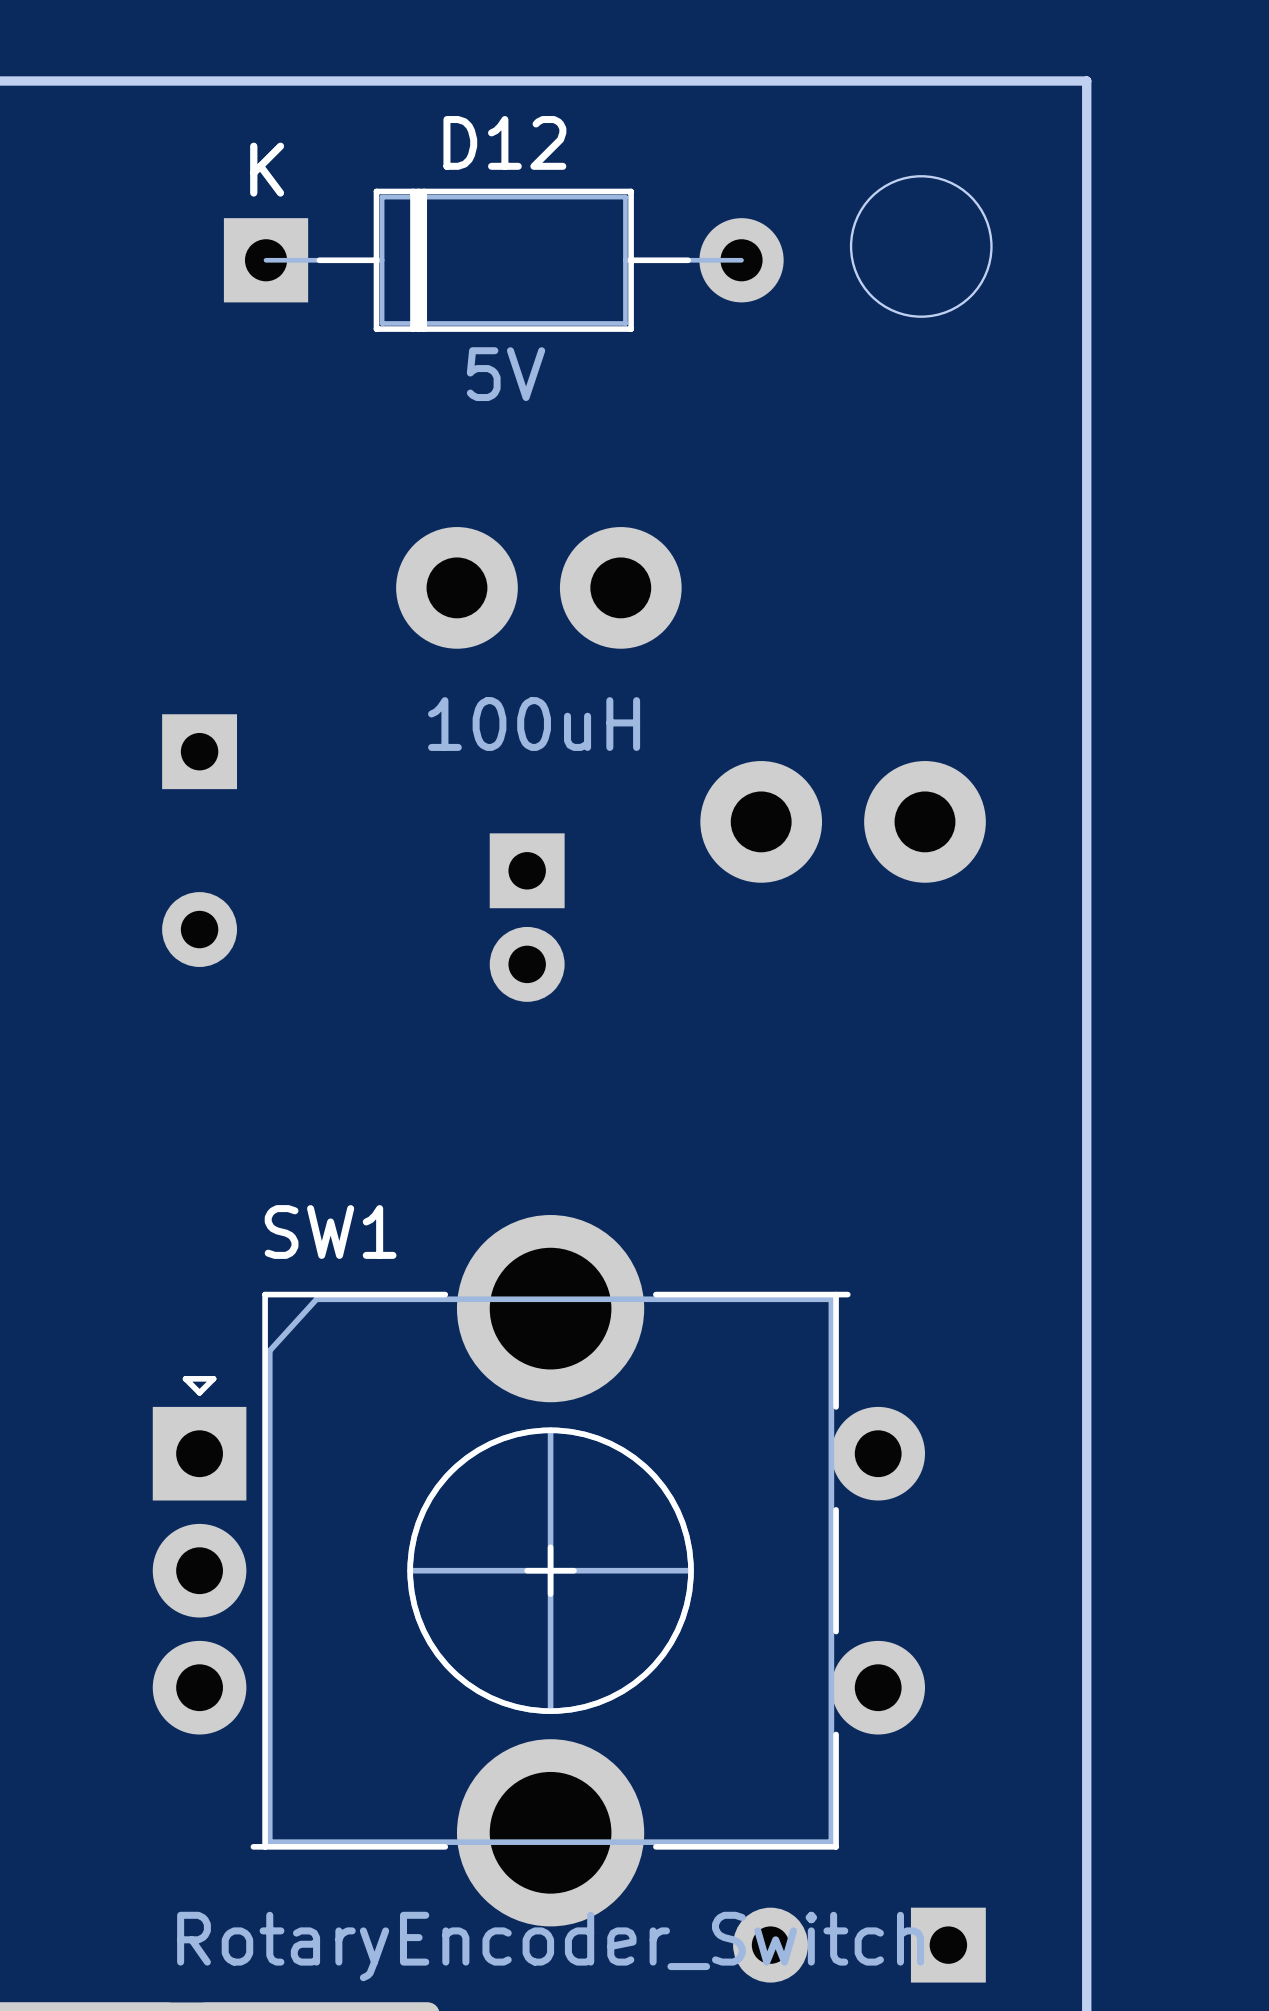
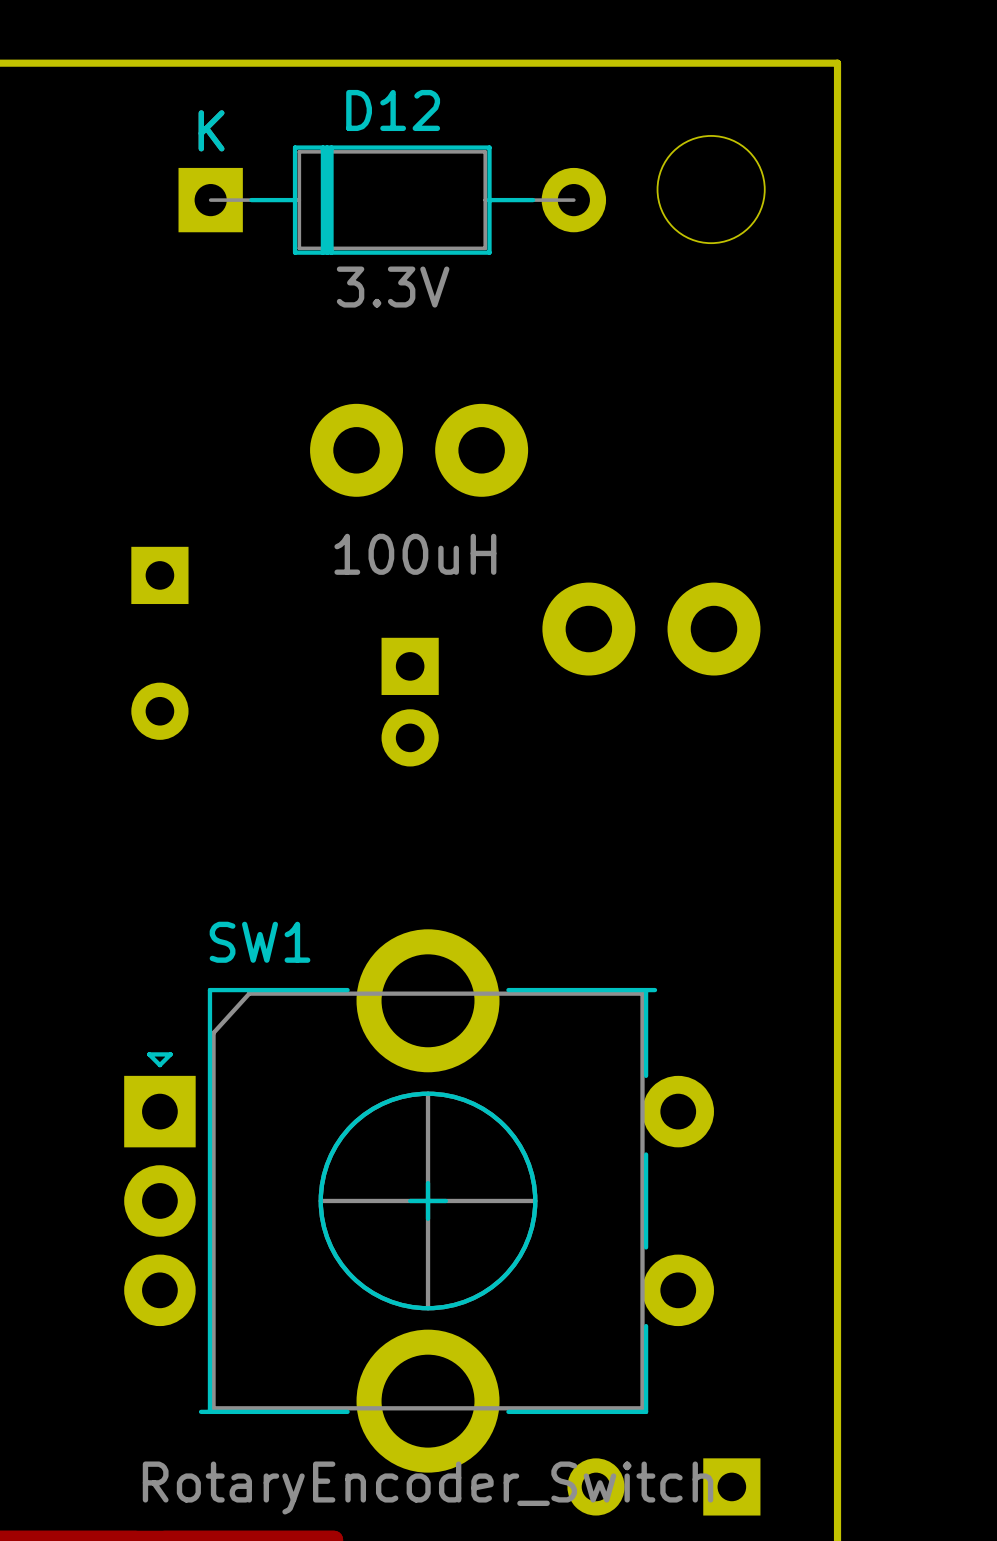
D12 value: 5V (506, 374) -> 3.3V (393, 287)

